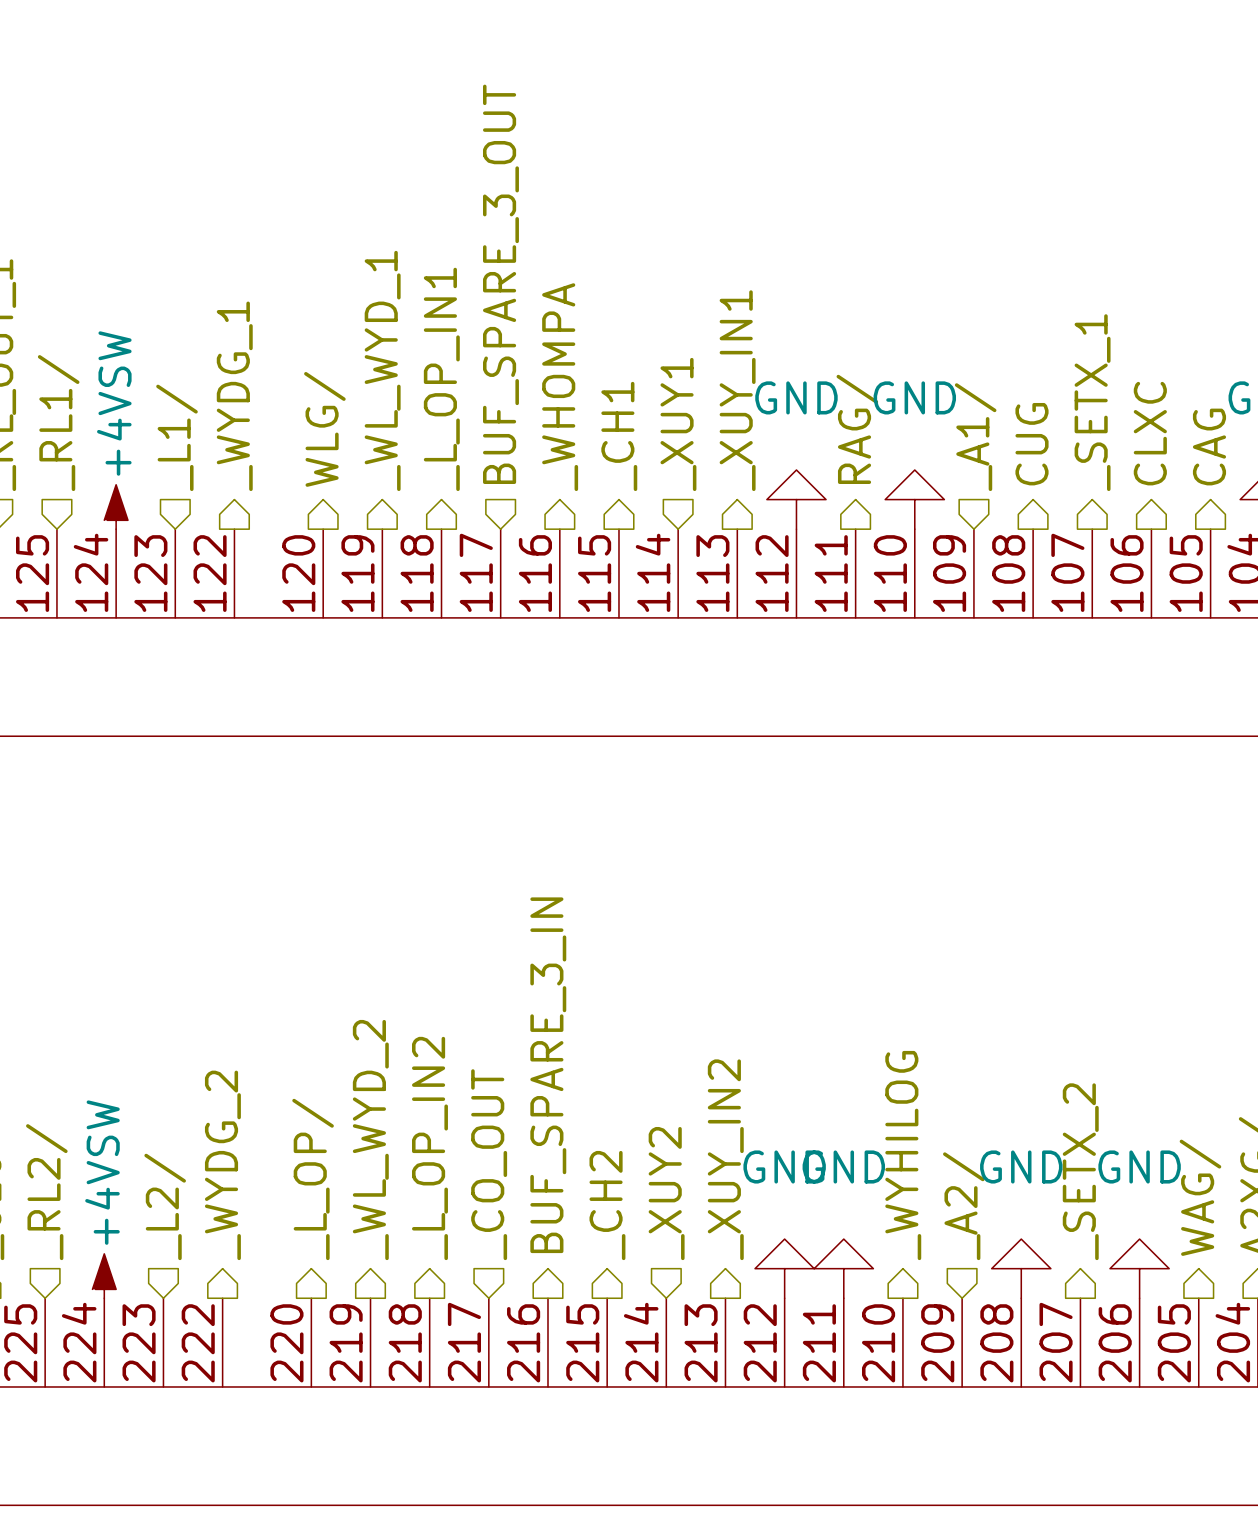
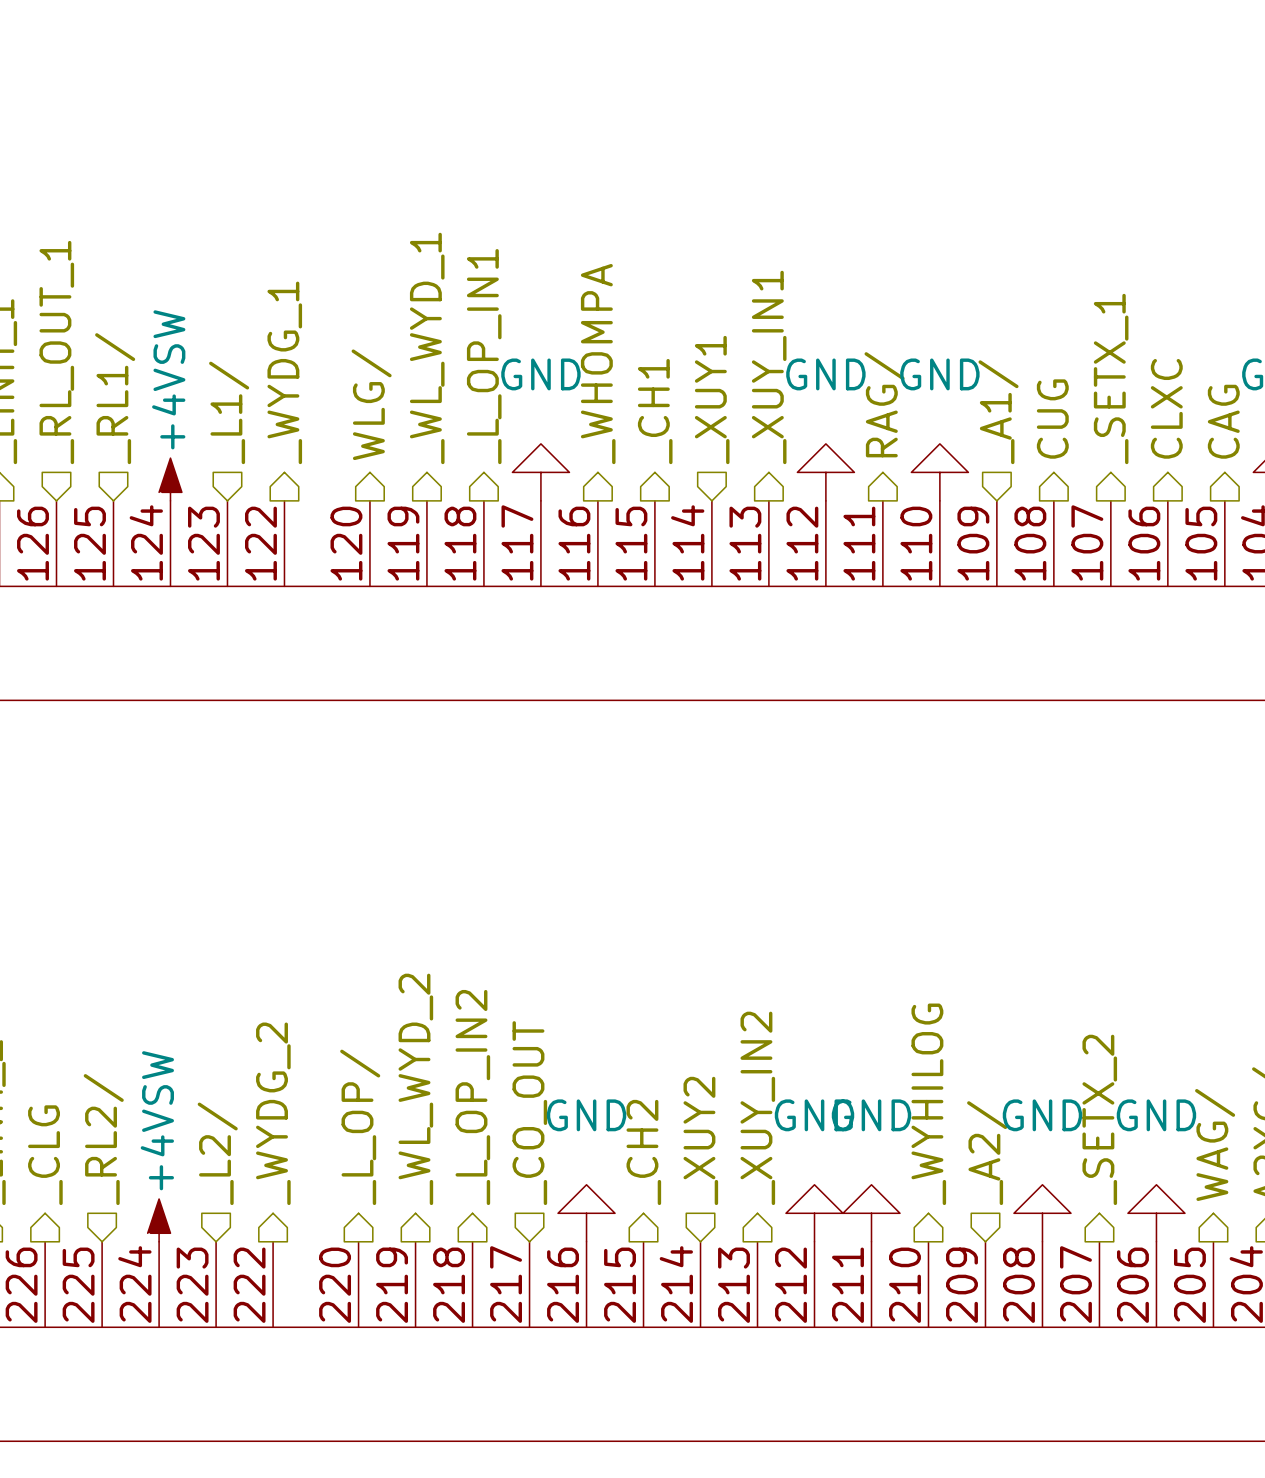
hierarchical label: BUF_SPARE_3_OUT (500, 284) -> none
power symbol: none -> GND (540, 472)
hierarchical label: BUF_SPARE_3_IN (548, 1075) -> none
power symbol: none -> GND (586, 1213)

